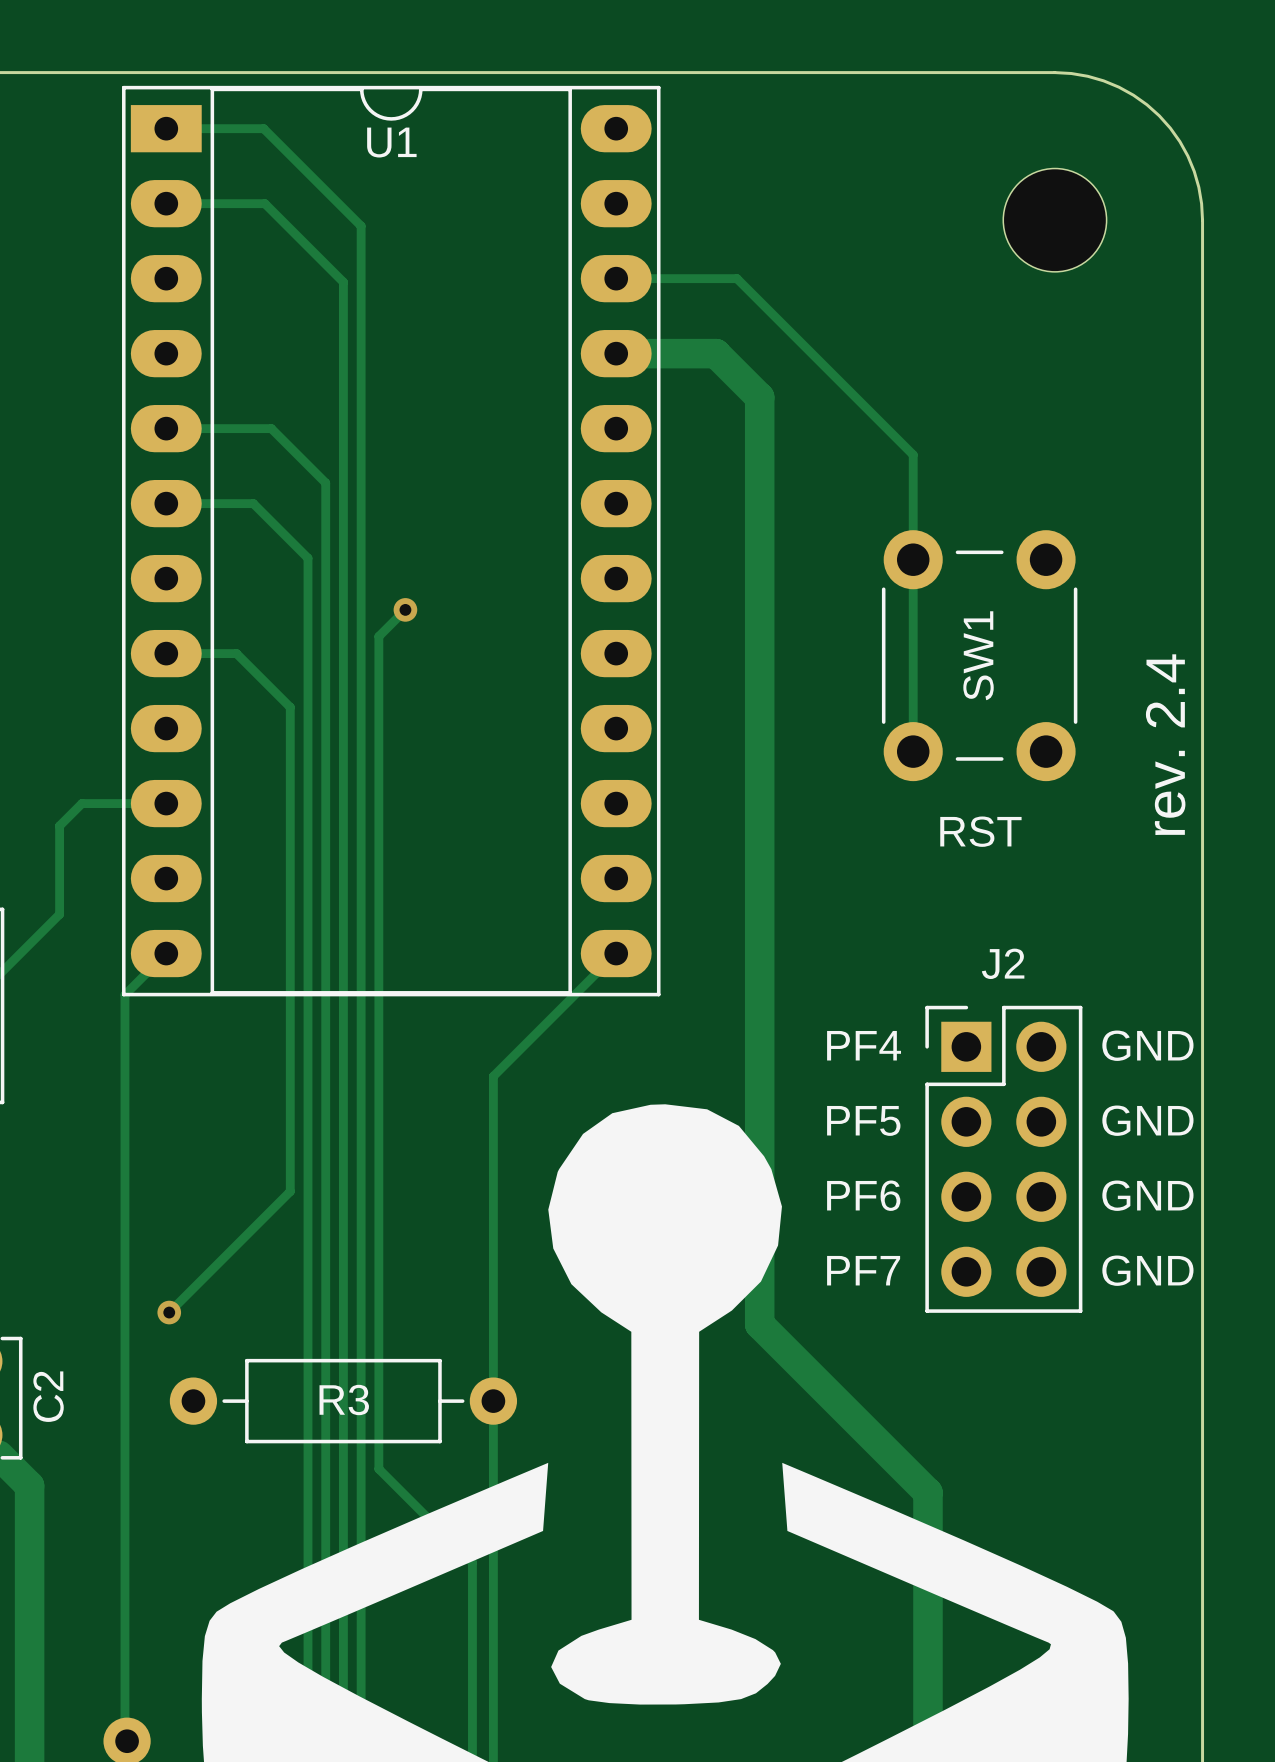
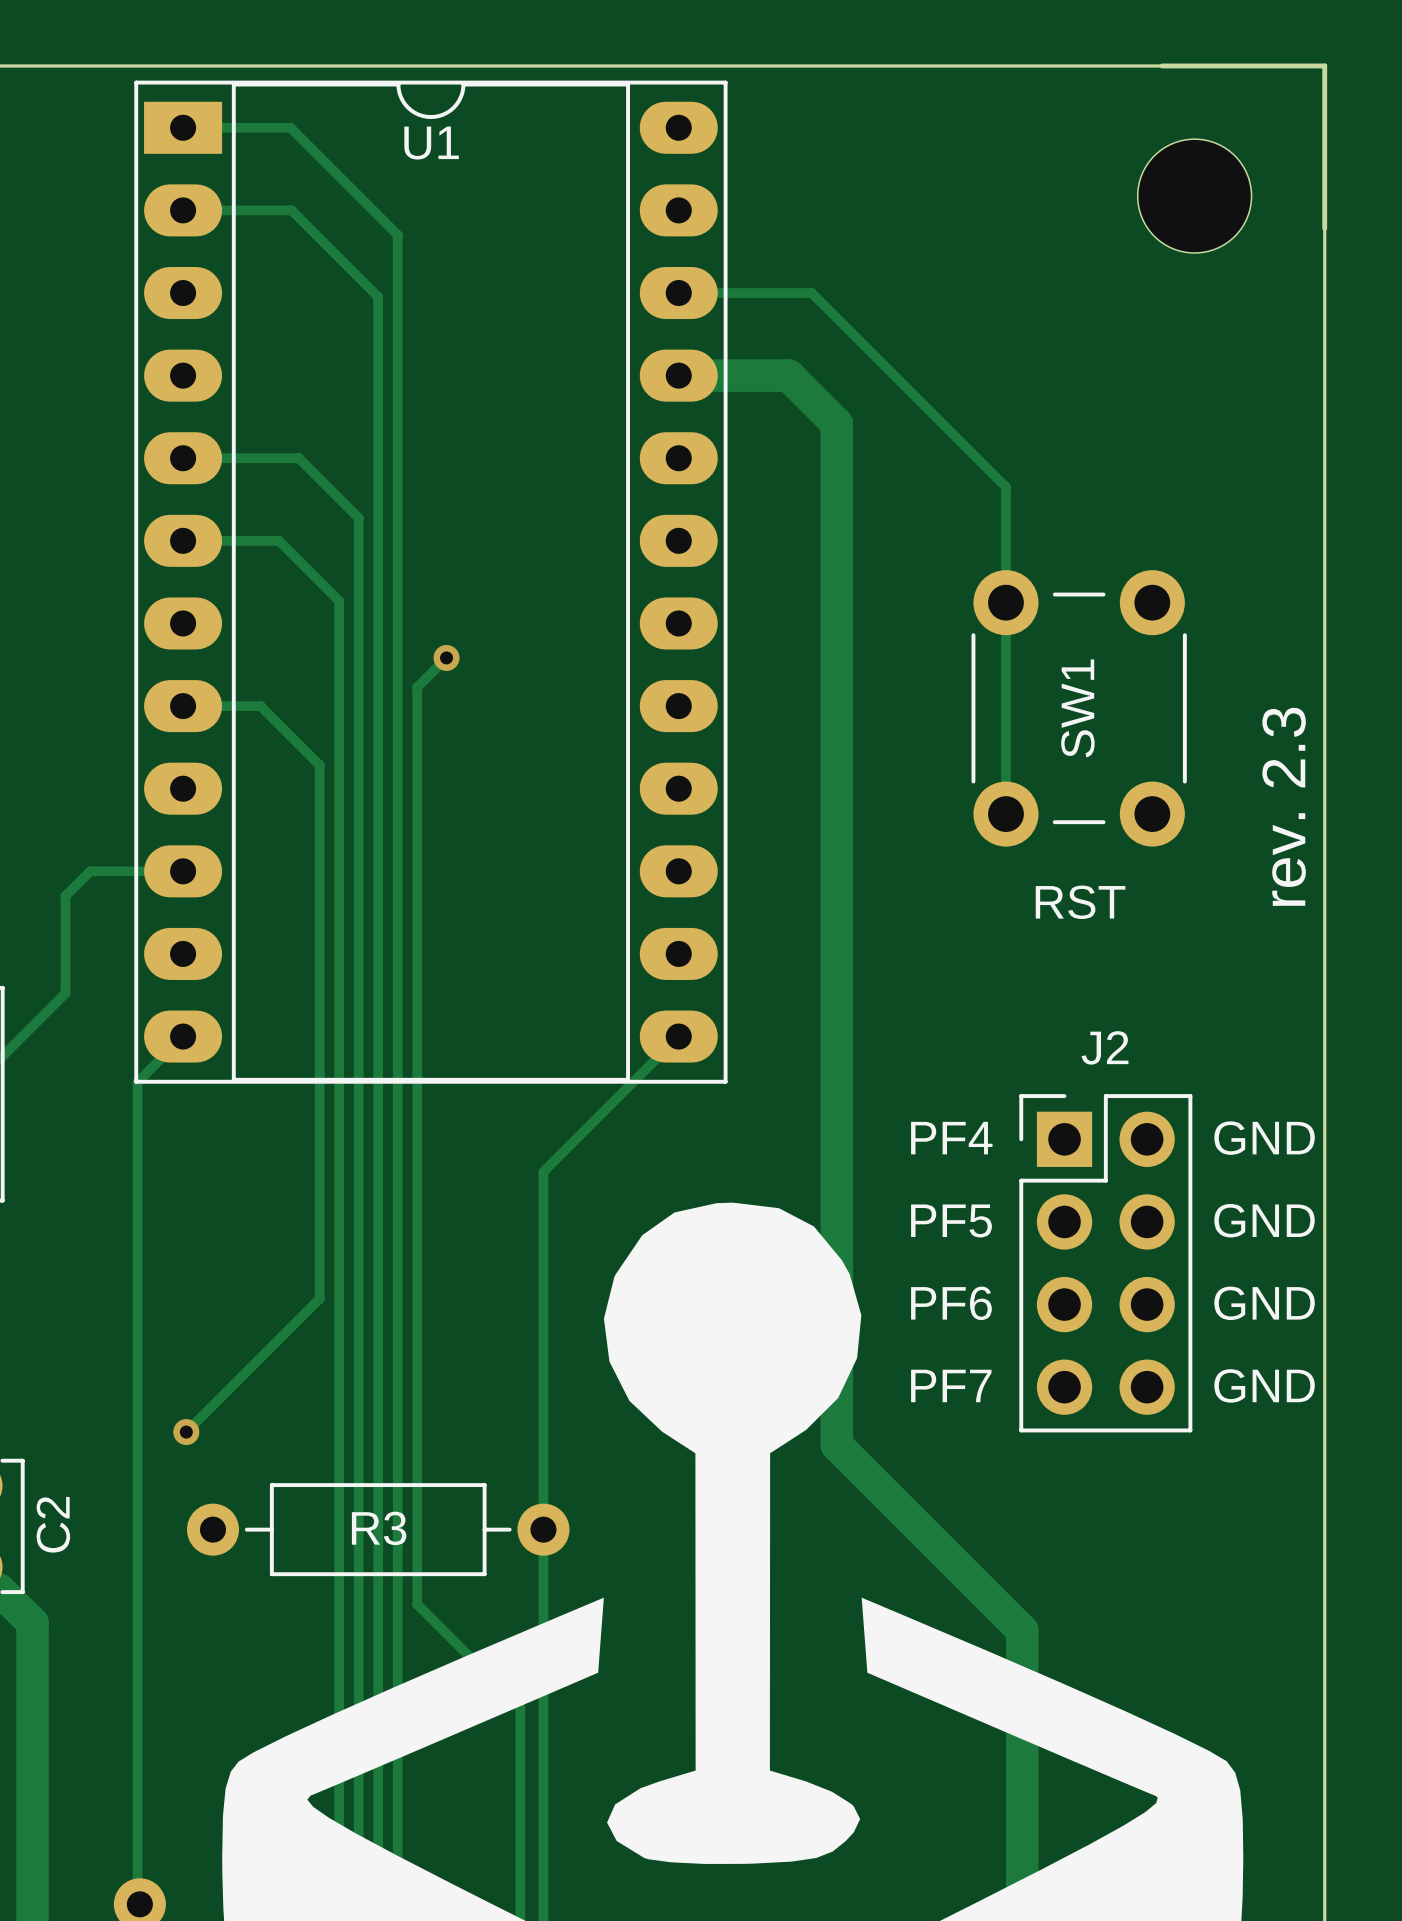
board edge: (1054, 72) (1087, 76) (1103, 80) (1133, 95) (1159, 115) (1179, 141) (1187, 156) (1198, 187) (1202, 220) -> (1162, 65) (1324, 65) (1324, 228)
part position: (1054, 220) -> (1194, 196)
text: rev. 2.4 (1165, 744) -> rev. 2.3 (1284, 806)

